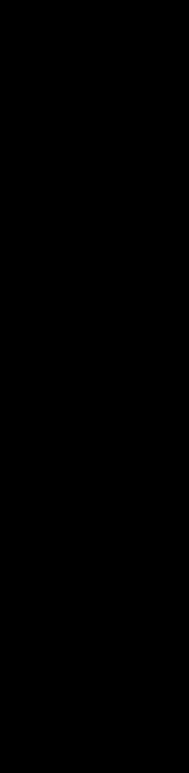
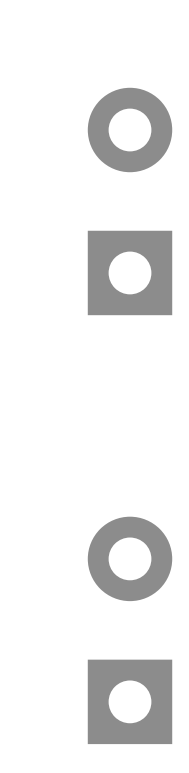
part: none -> (130, 201)
part: none -> (130, 630)

